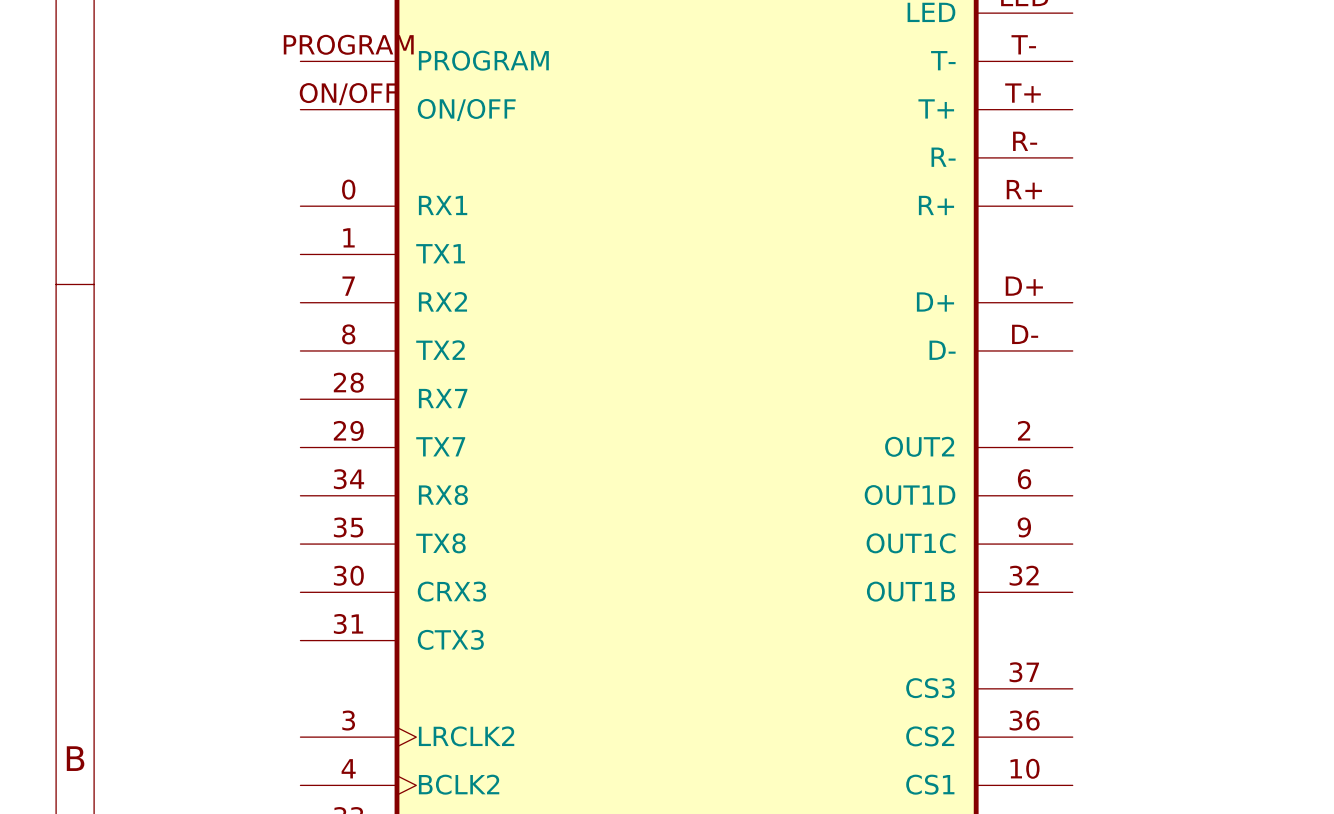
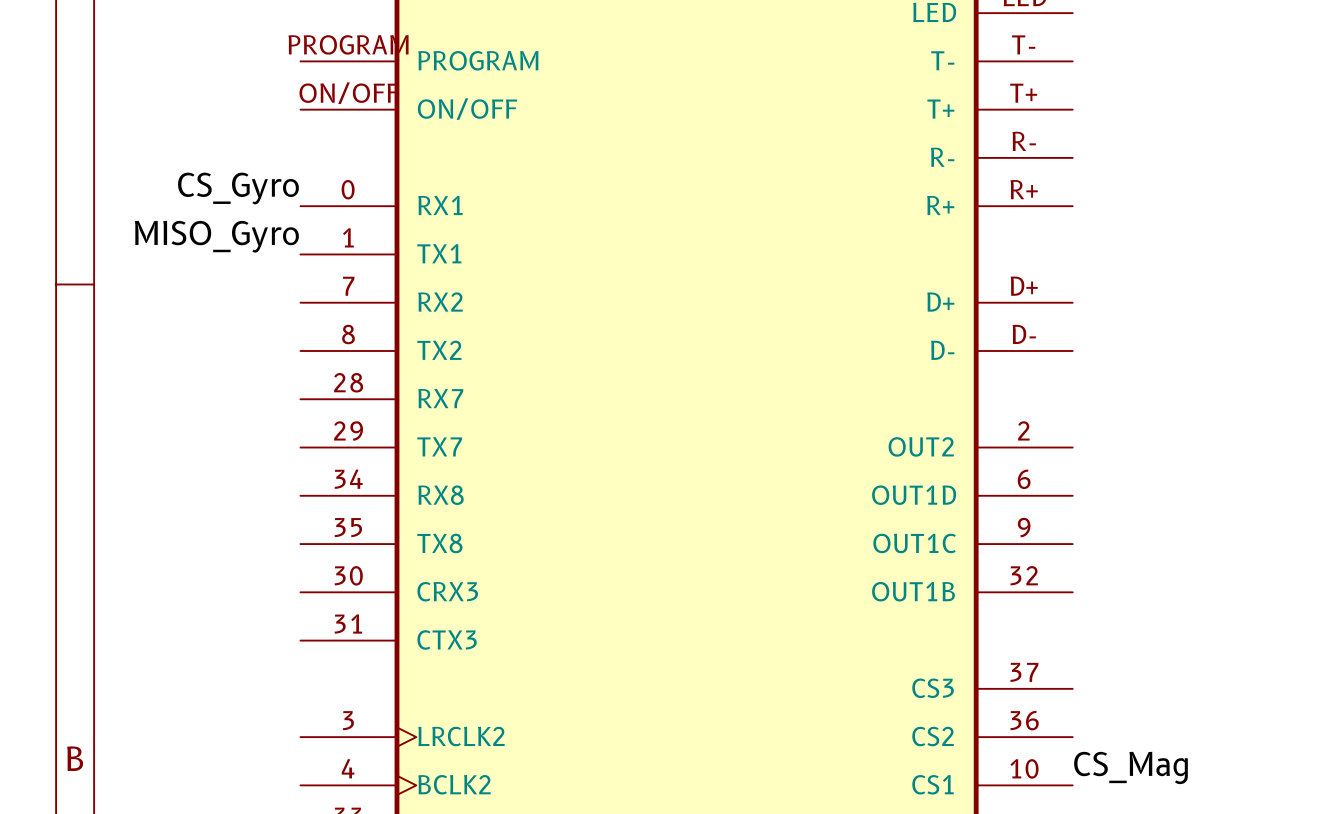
label: none -> CS_Gyro (238, 188)
label: none -> MISO_Gyro (216, 236)
label: none -> CS_Mag (1130, 767)

